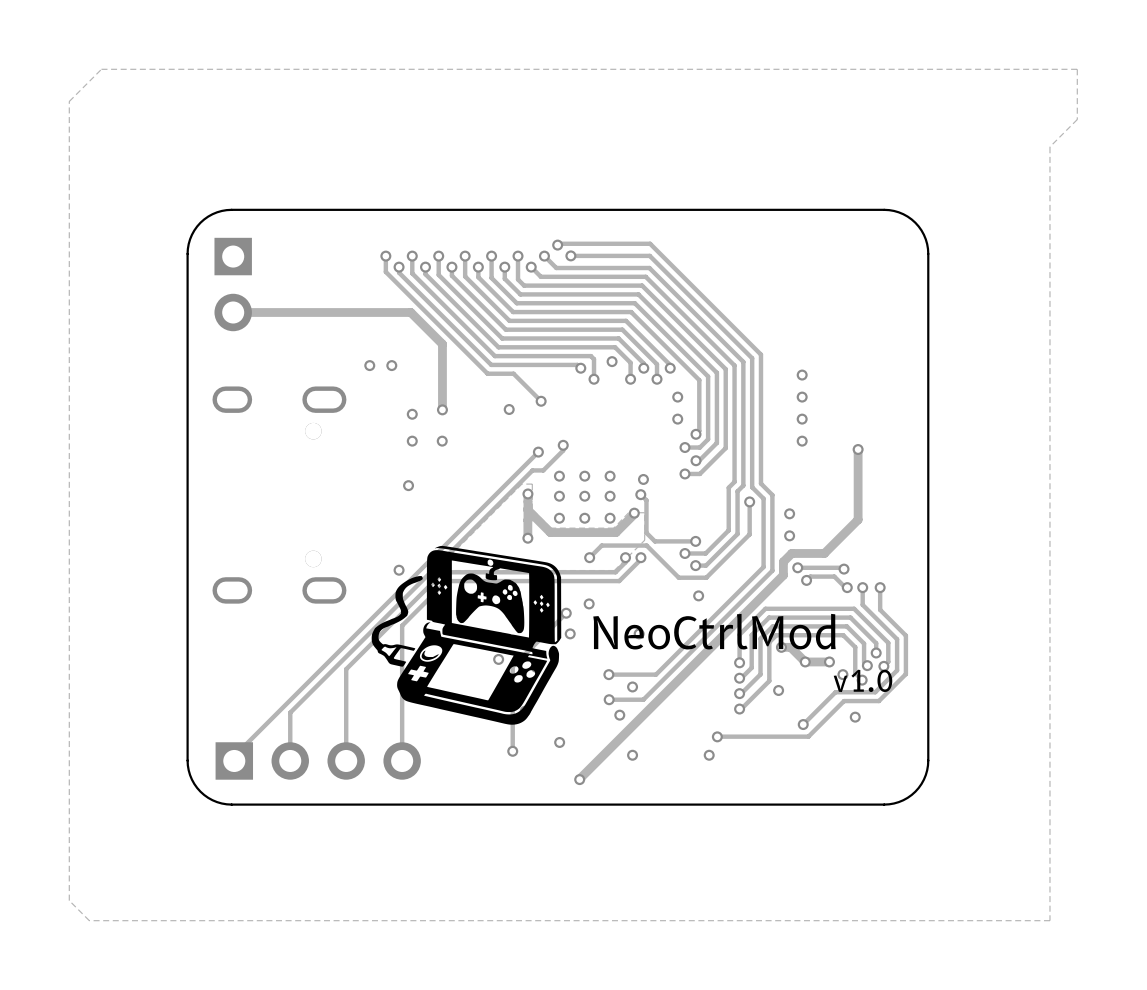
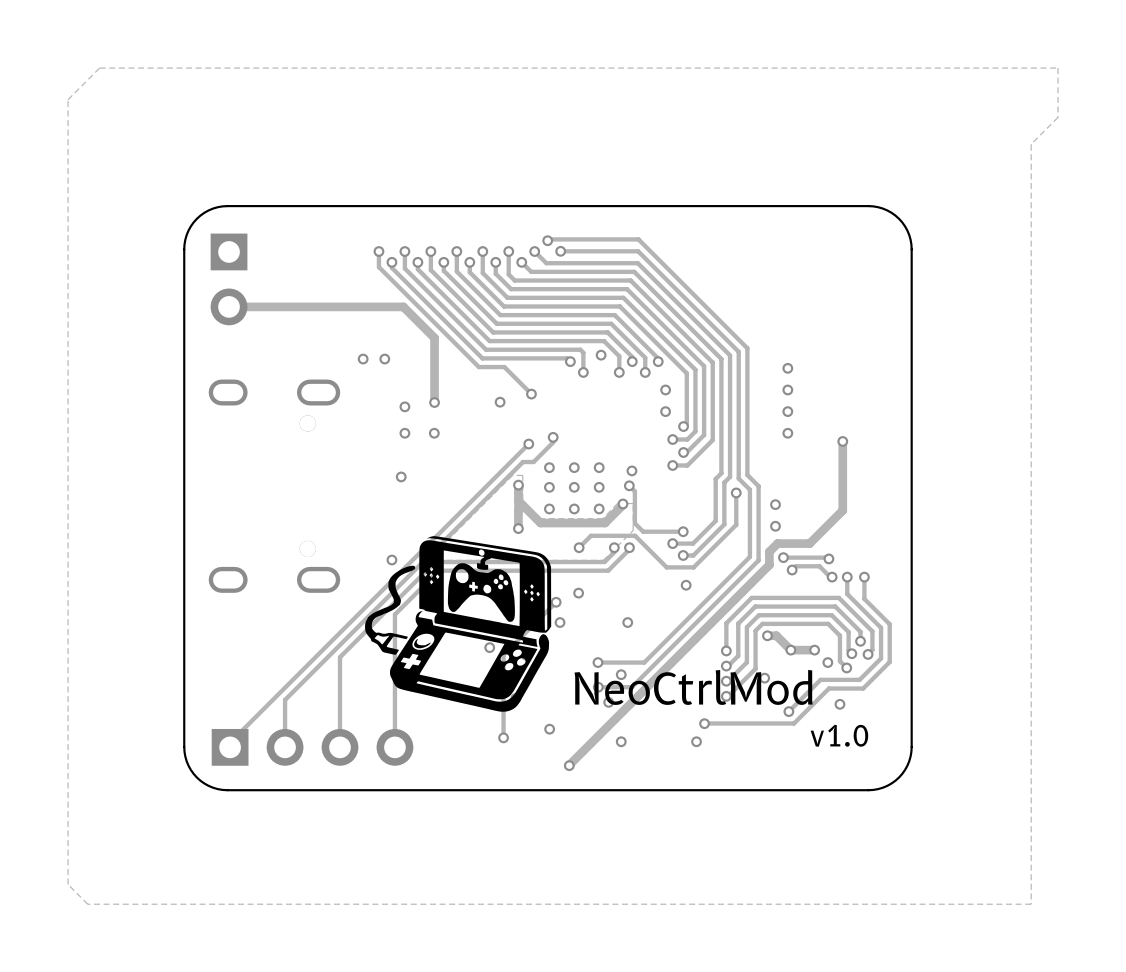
text position: NeoCtrlMod (714, 631) -> NeoCtrlMod (693, 687)
text position: v1.0 (862, 680) -> v1.0 (839, 735)

